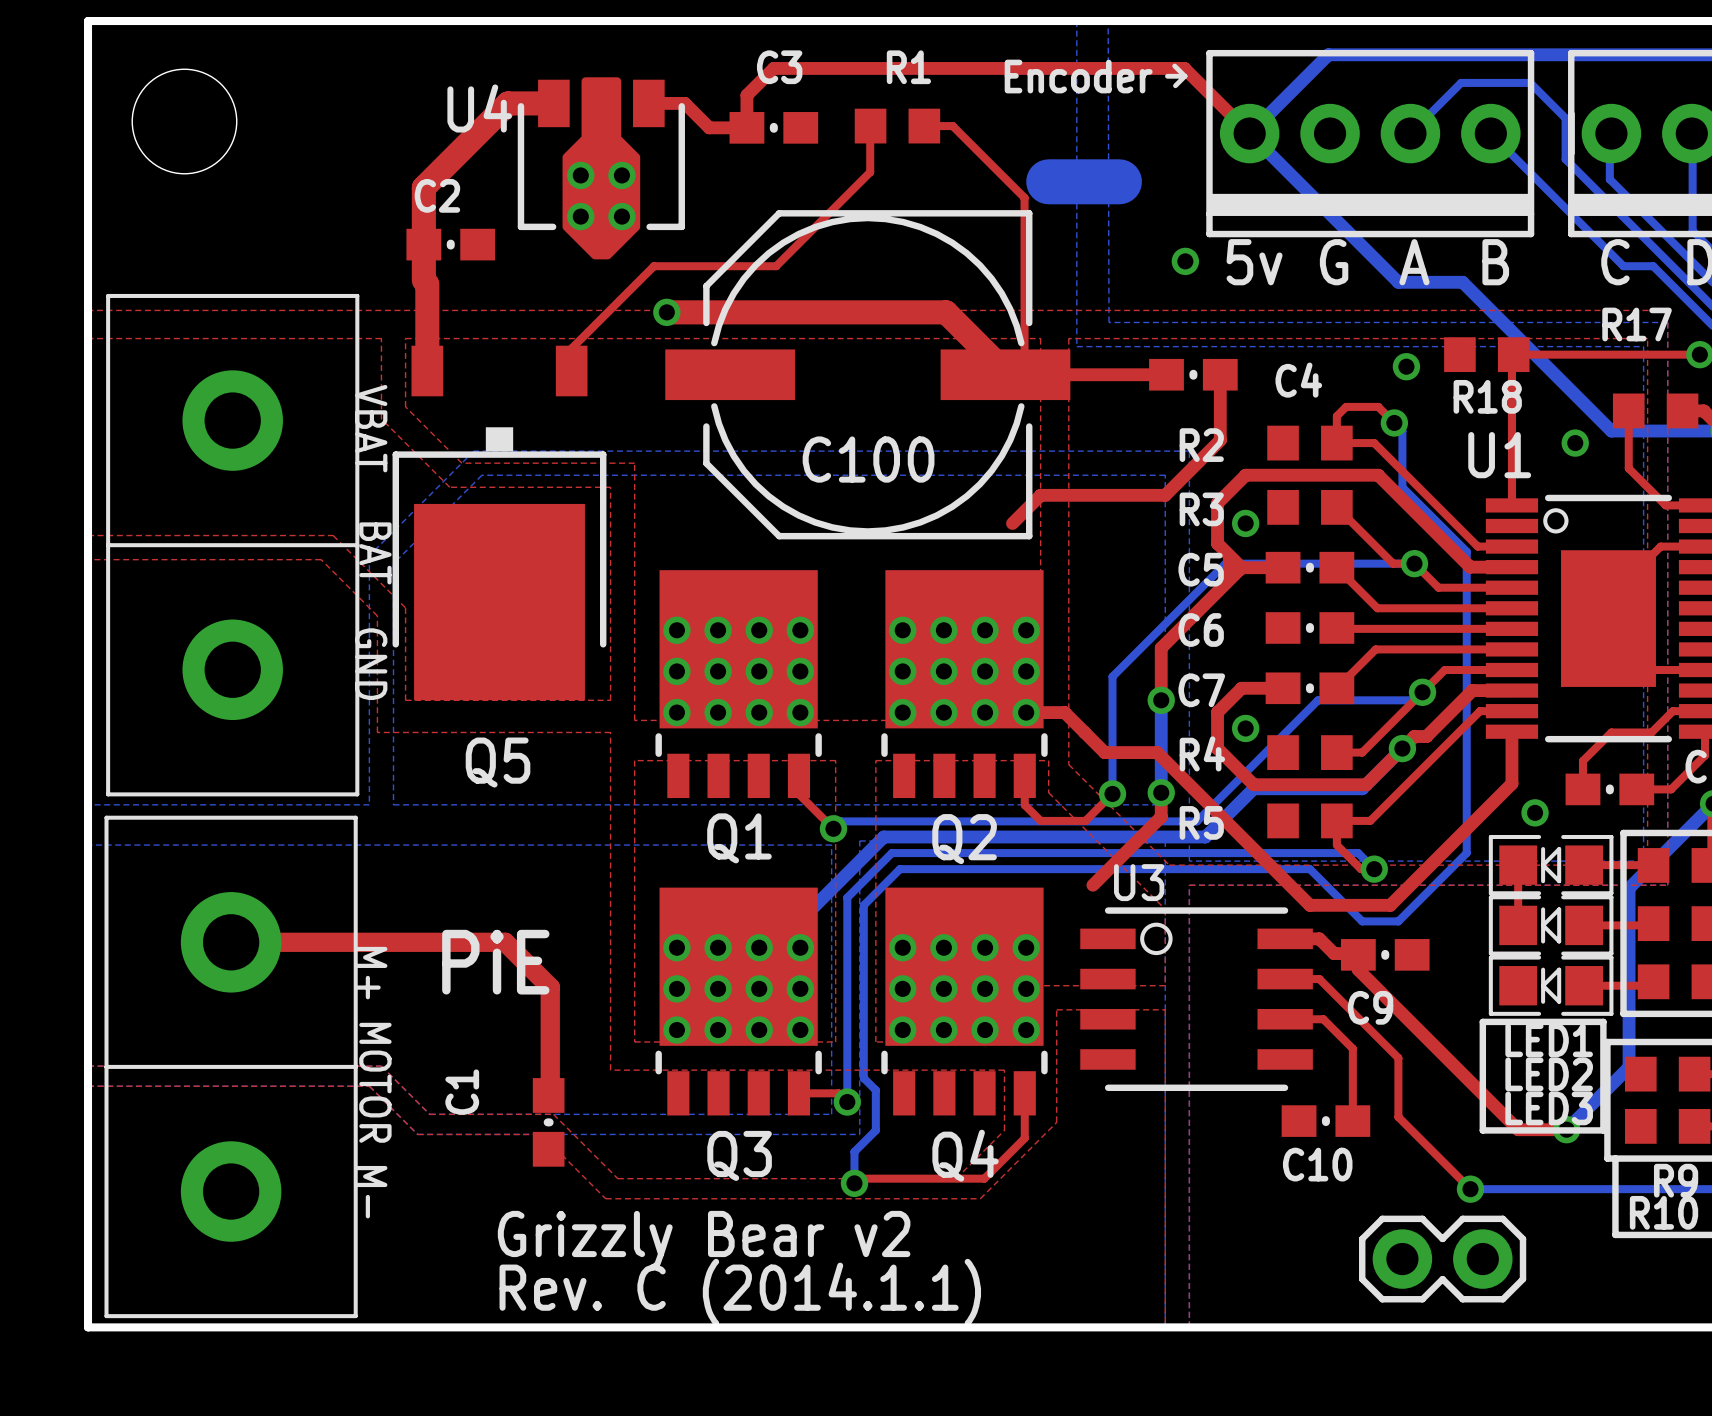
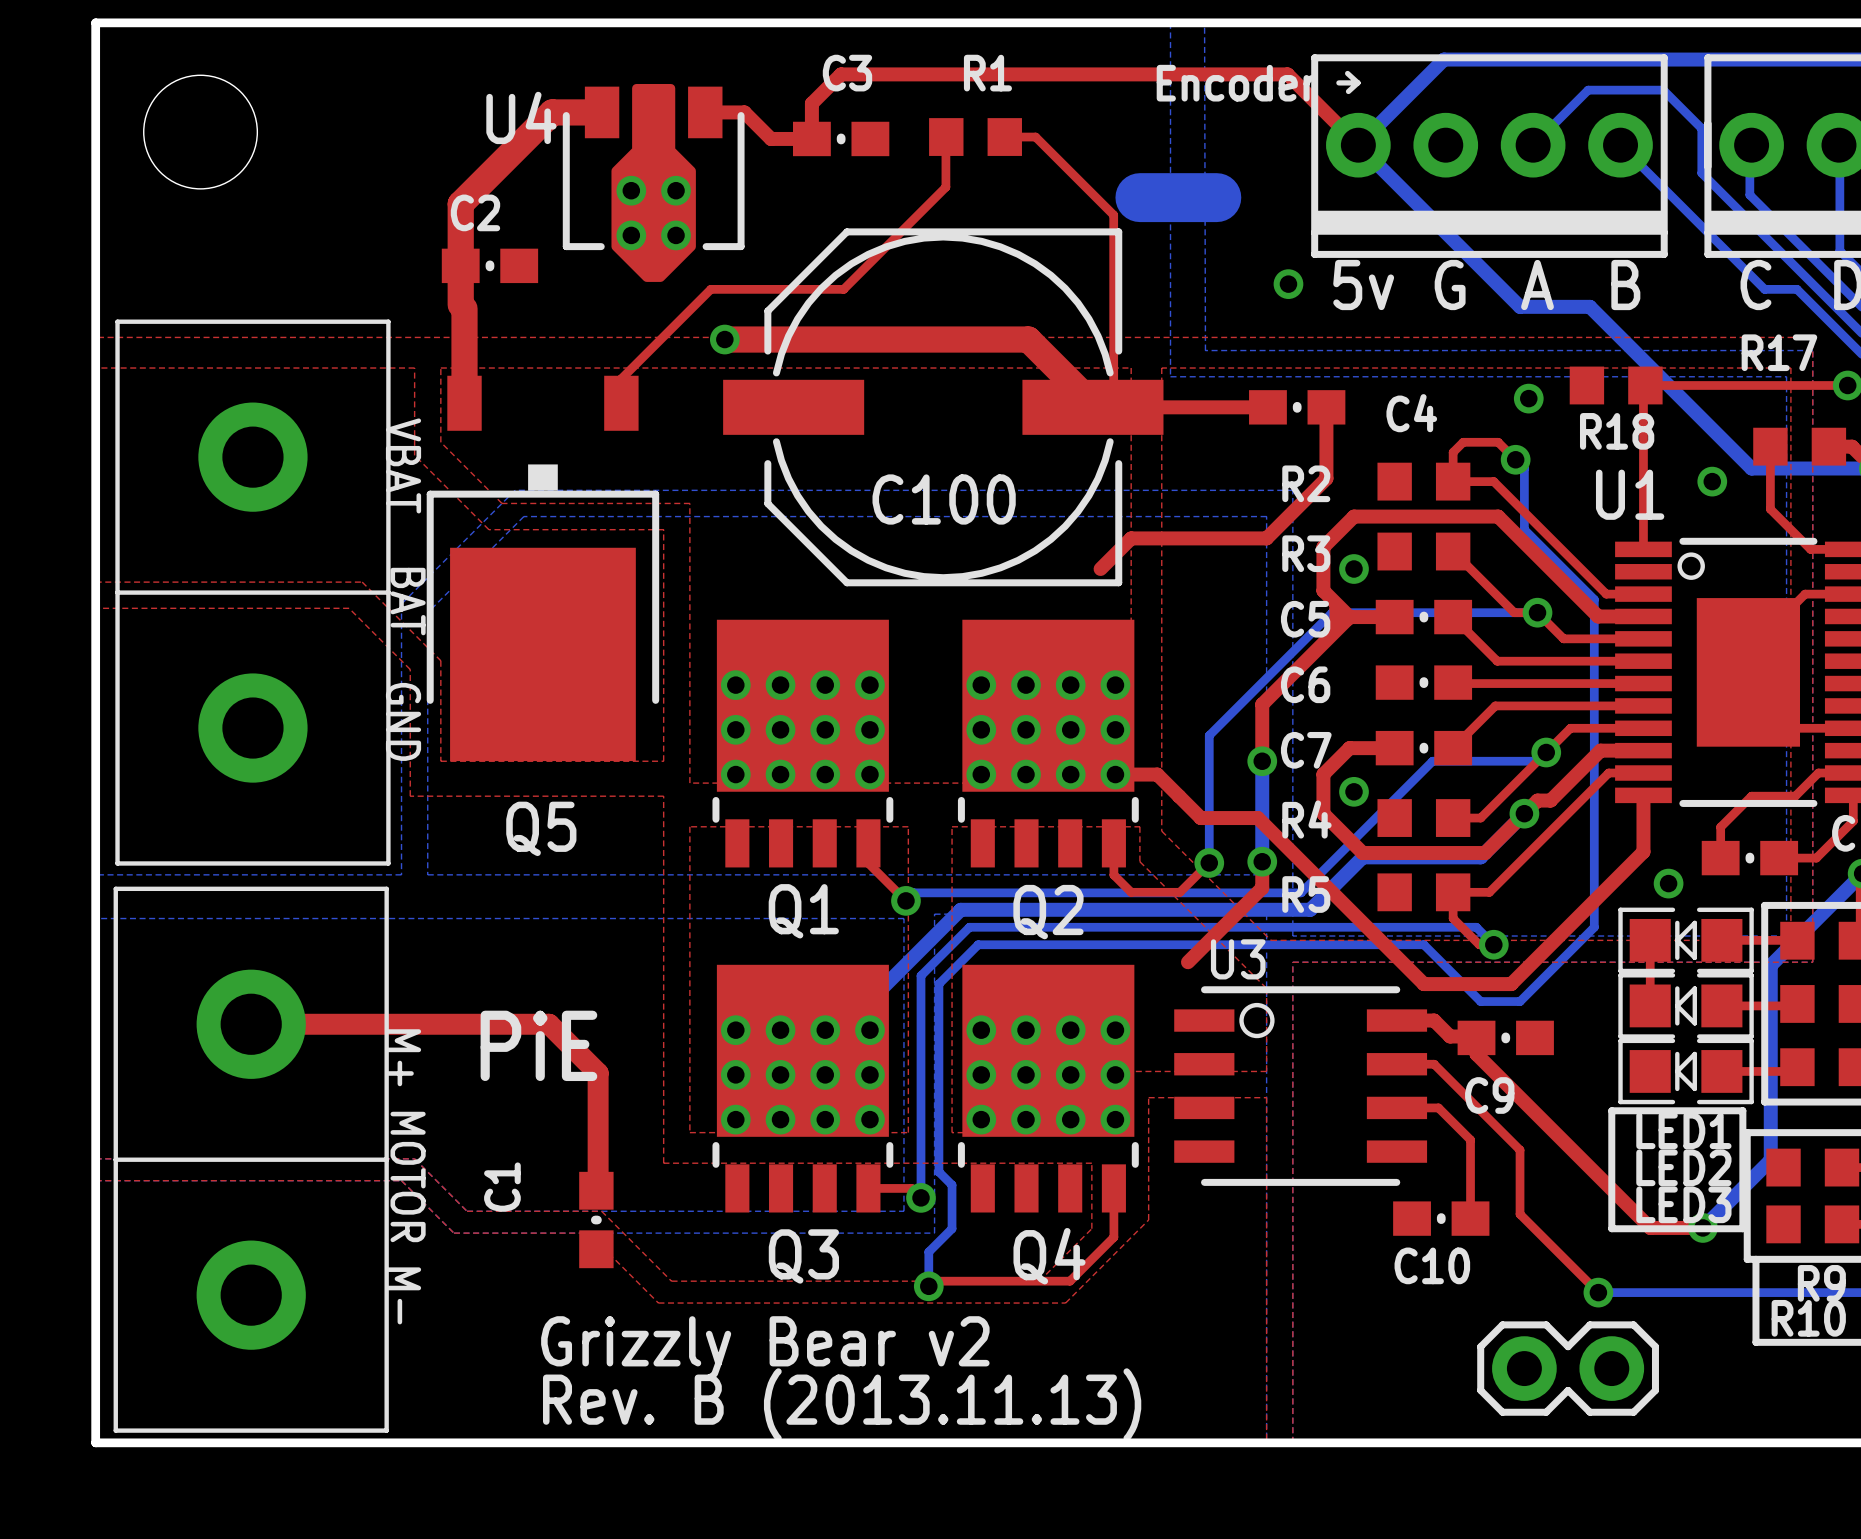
line: (1174, 65) (1184, 76) -> none
line: none -> (1347, 73) (1357, 82)
text position: Encoder (1078, 76) -> Encoder (1237, 83)
line: (1167, 76) (1184, 76) -> (1338, 82) (1357, 82)
line: (1184, 76) (1175, 85) -> none
line: none -> (1357, 82) (1348, 91)
text: Rev. C (2014.1.1) (740, 1292) -> Rev. B (2013.11.13) (842, 1404)

